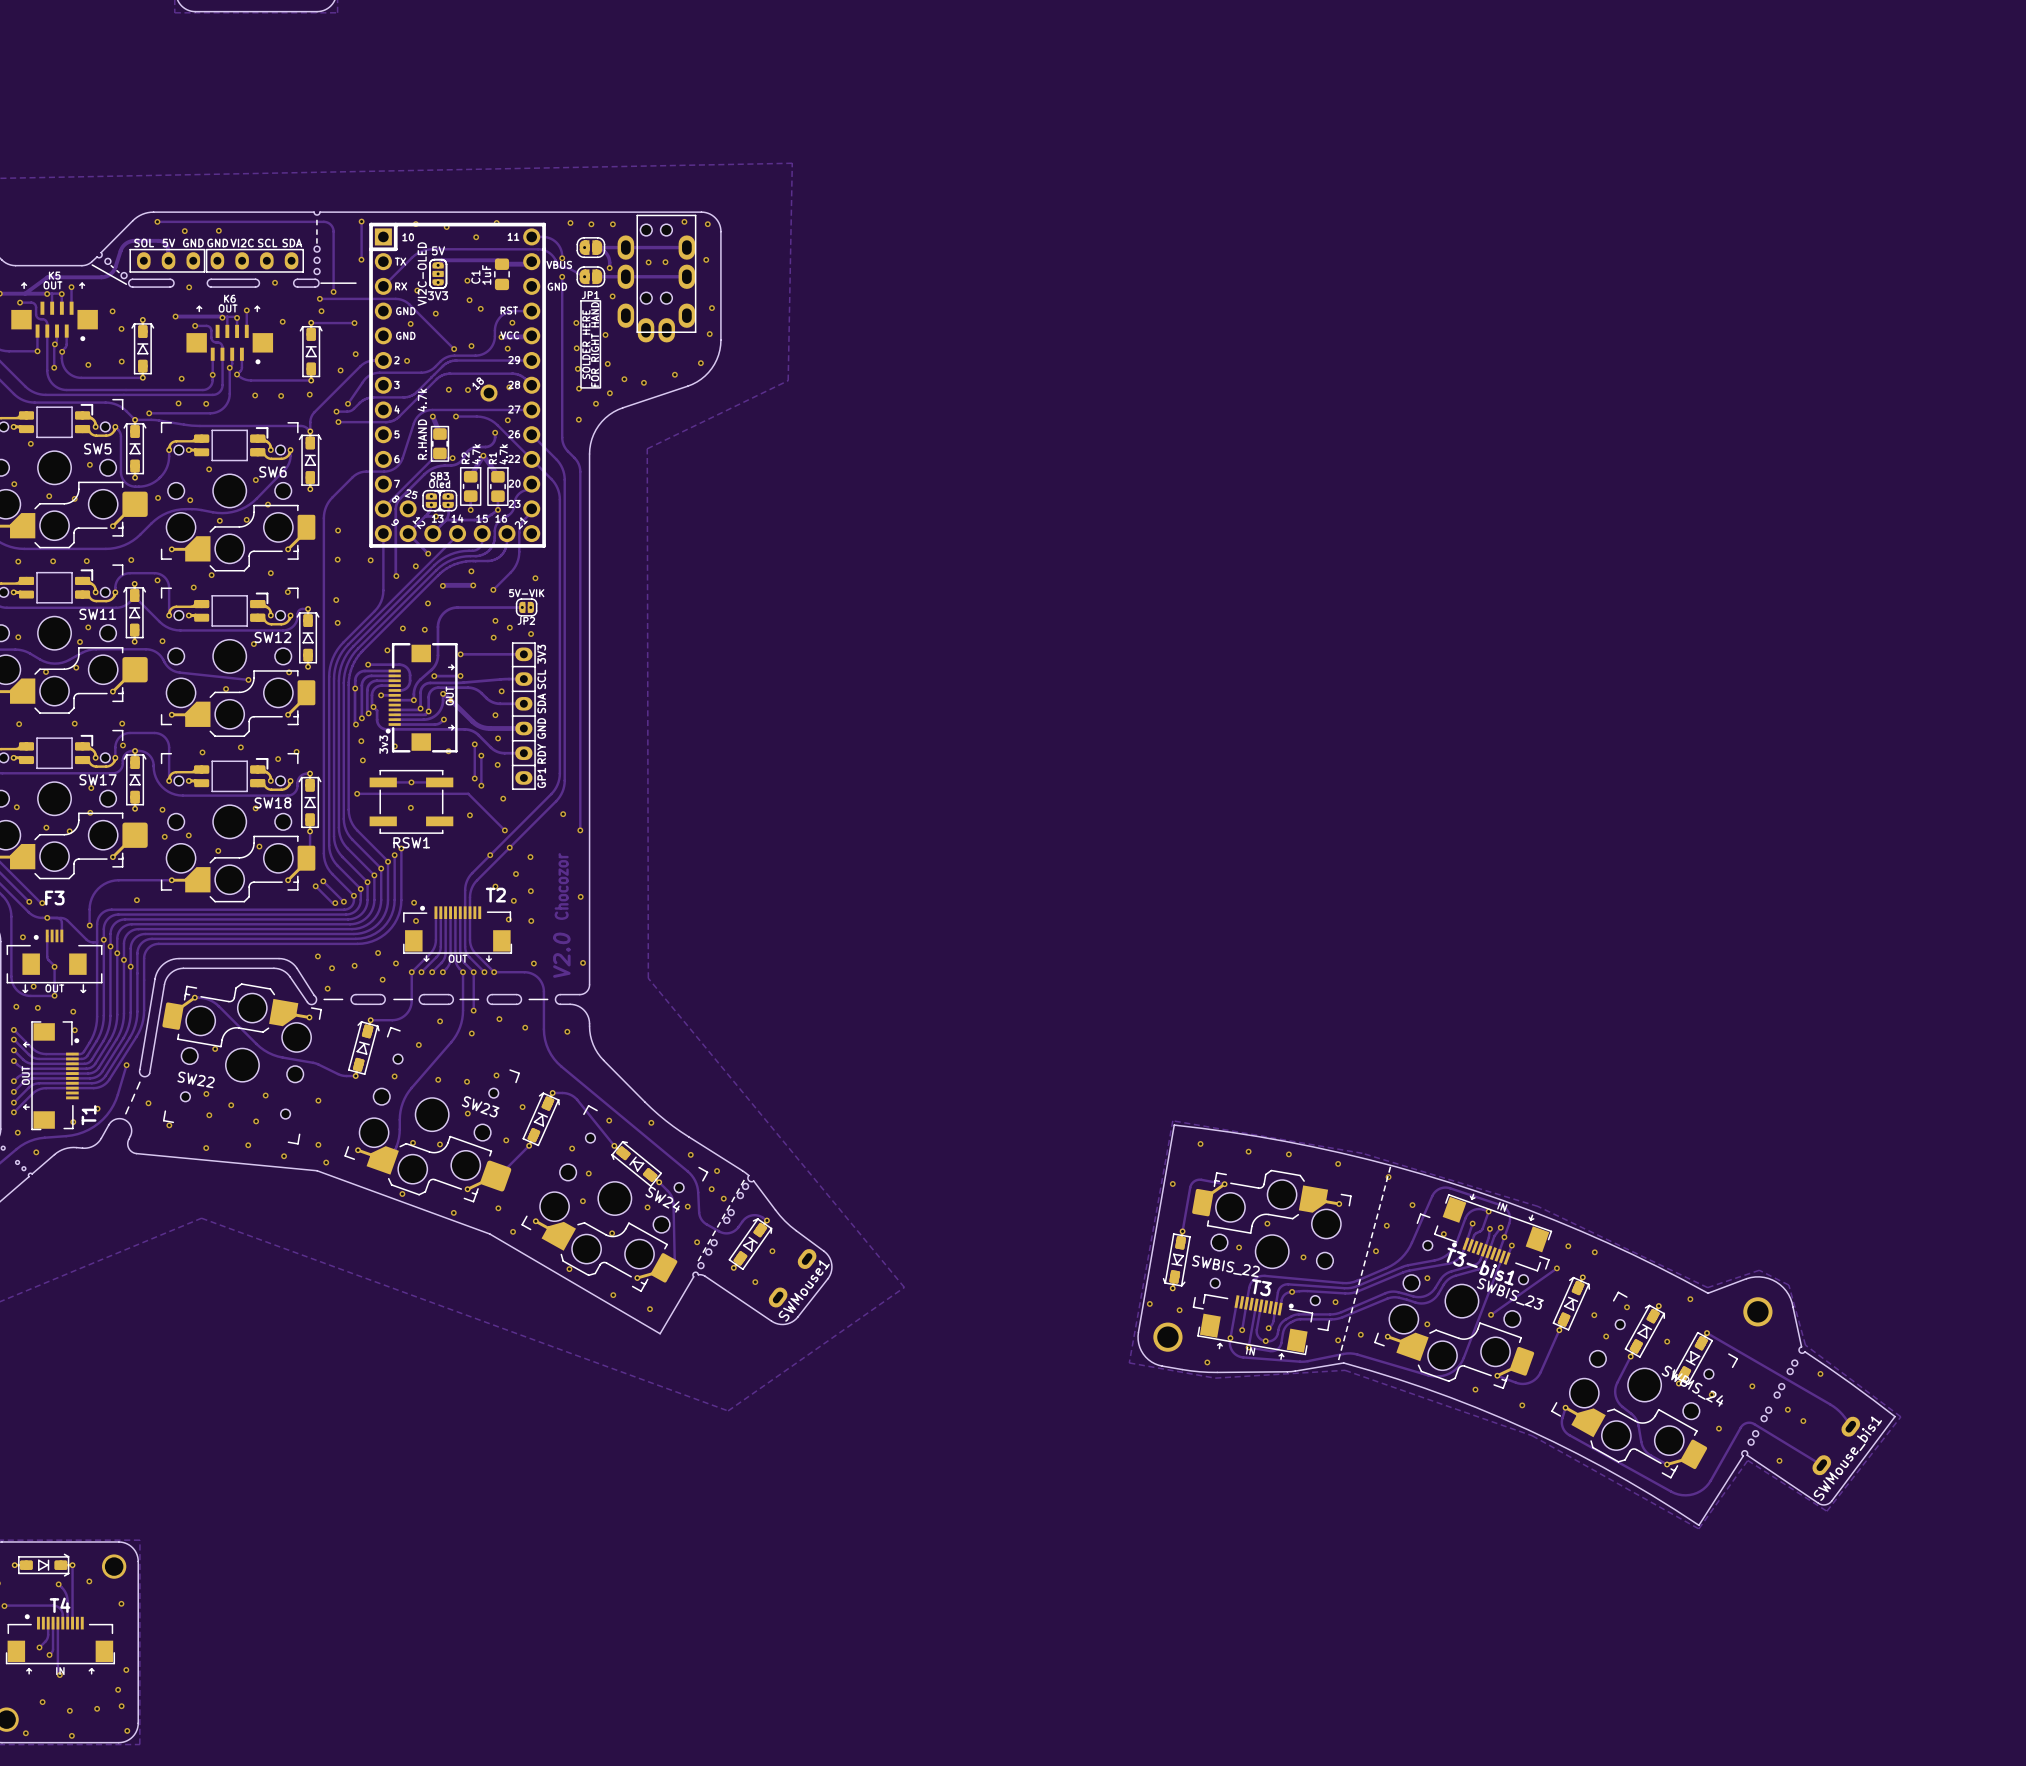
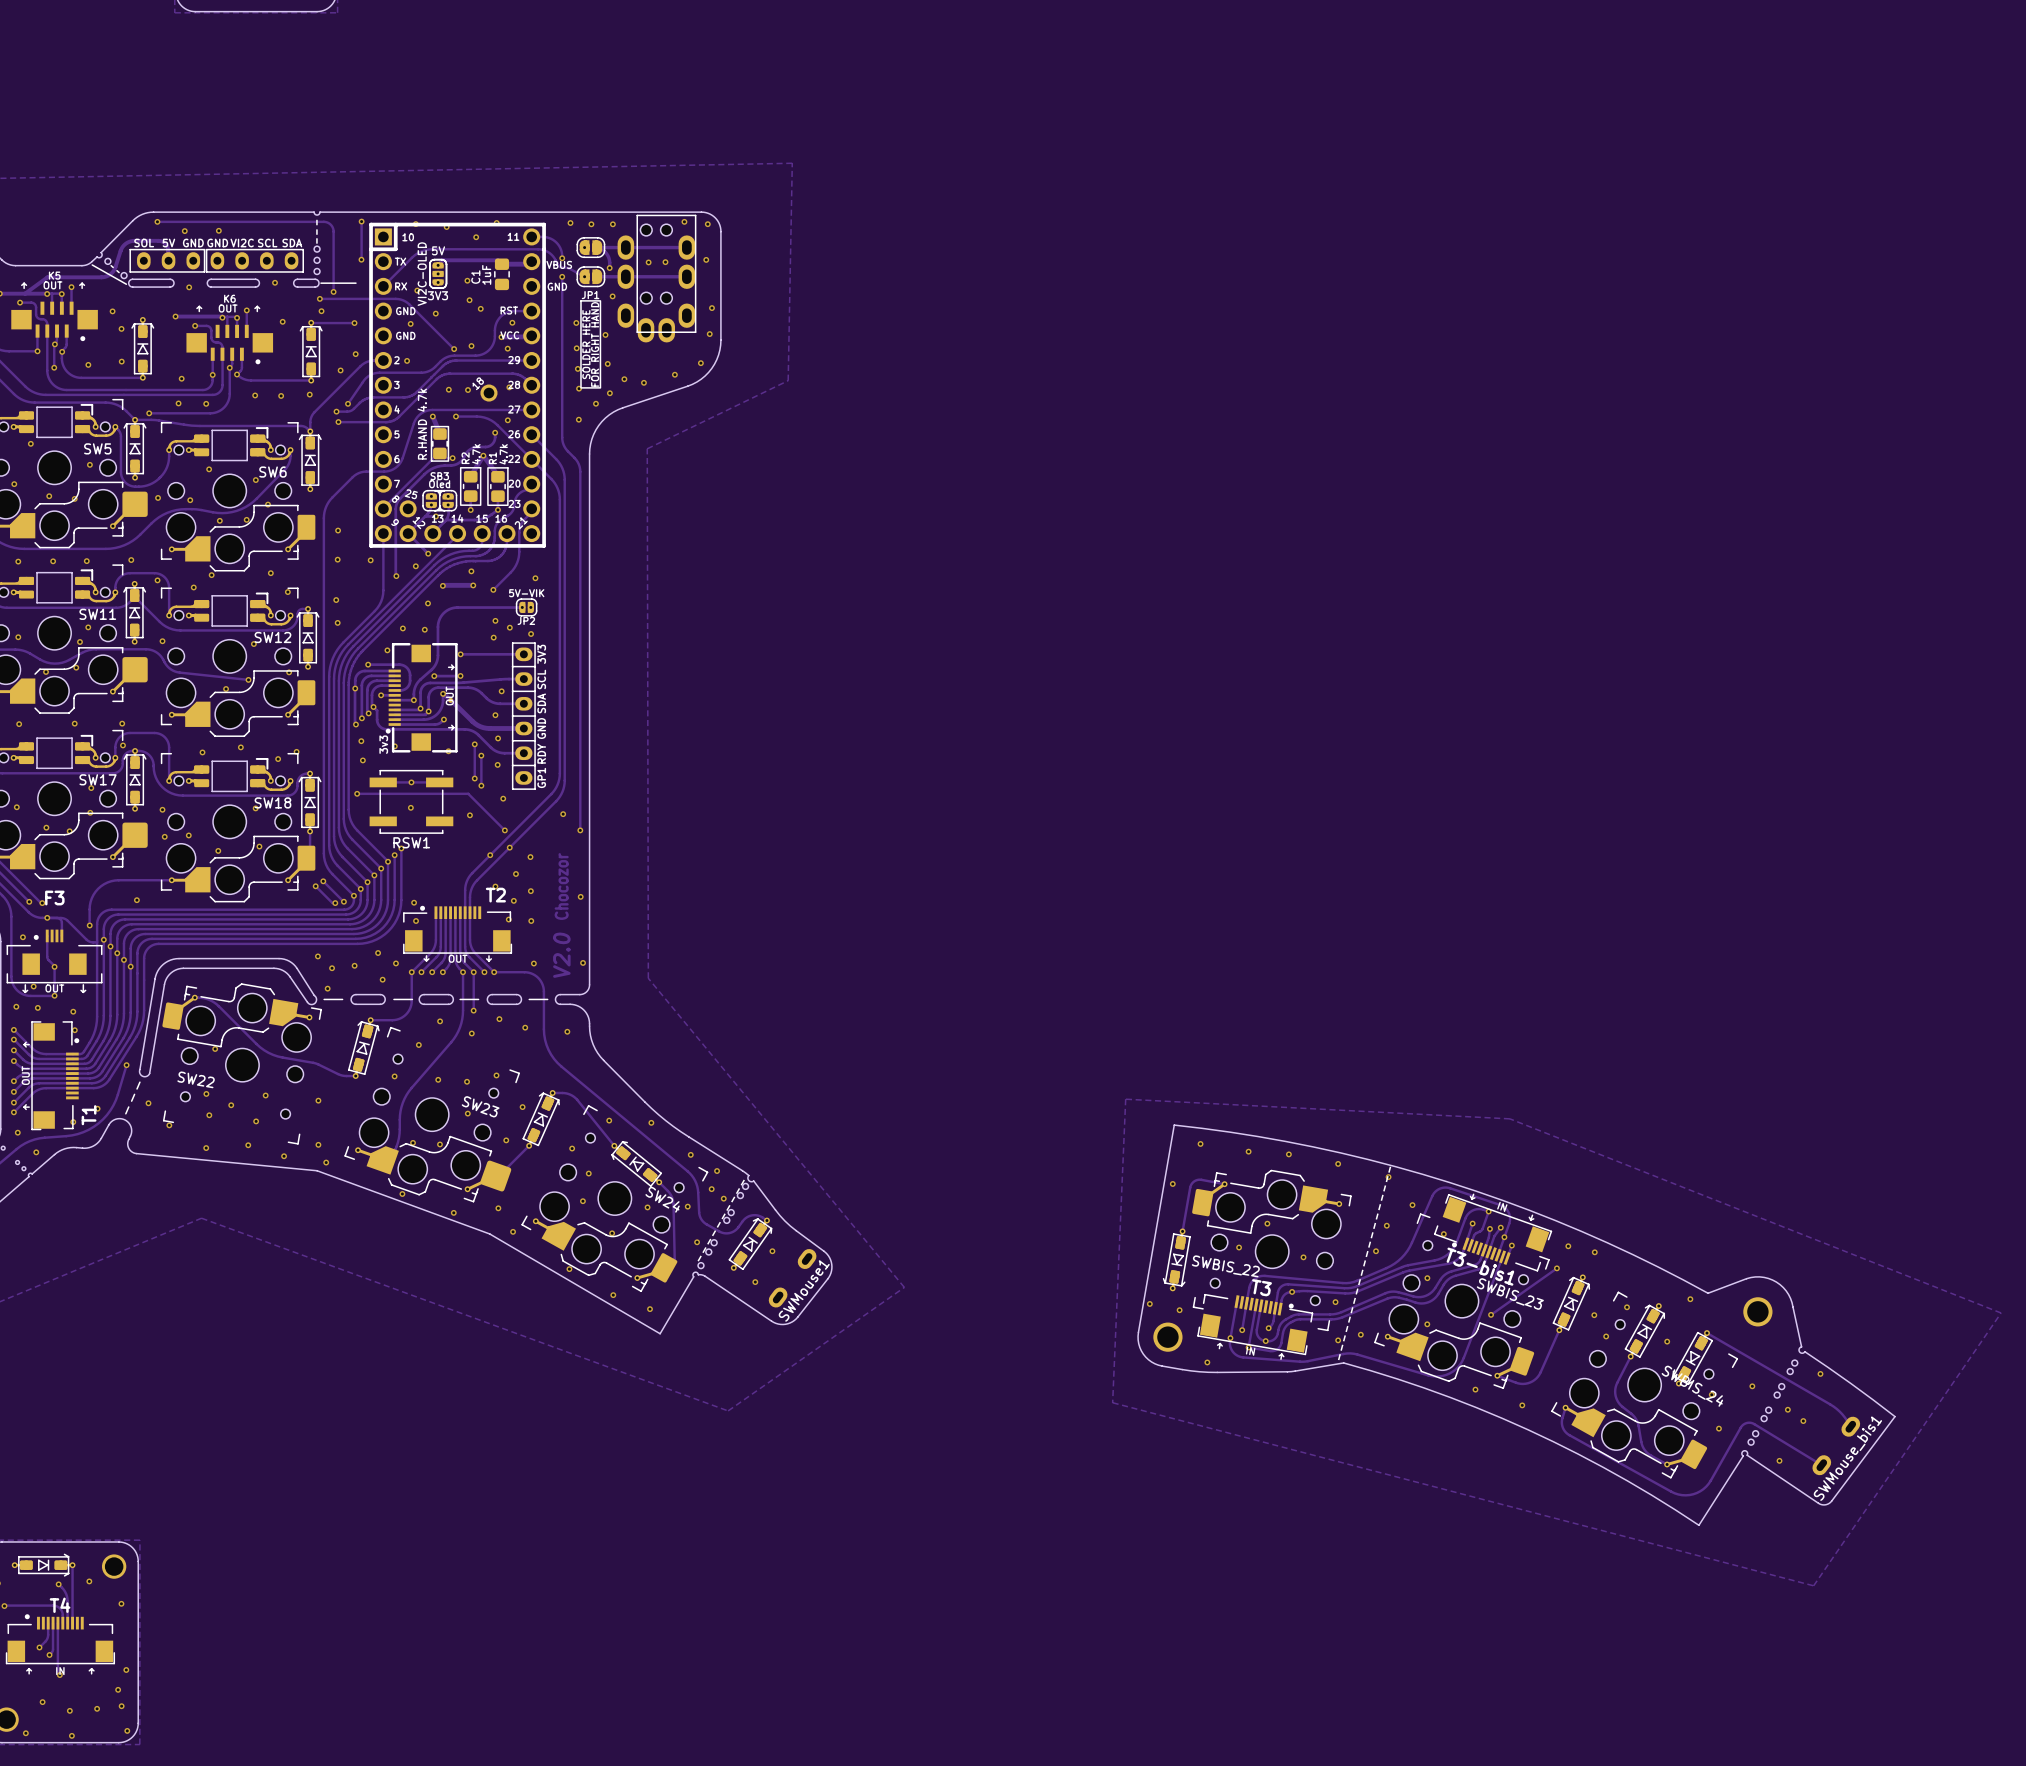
zone outline: (1172, 1120) (1362, 1153) (1537, 1206) (1707, 1287) (1759, 1270) (1788, 1285) (1805, 1345) (1900, 1416) (1826, 1511) (1747, 1460) (1698, 1528) (1532, 1435) (1345, 1370) (1215, 1378) (1129, 1362) (1172, 1120) -> (1125, 1099) (1112, 1402) (1813, 1585) (2001, 1313) (1509, 1118) (1125, 1099)

